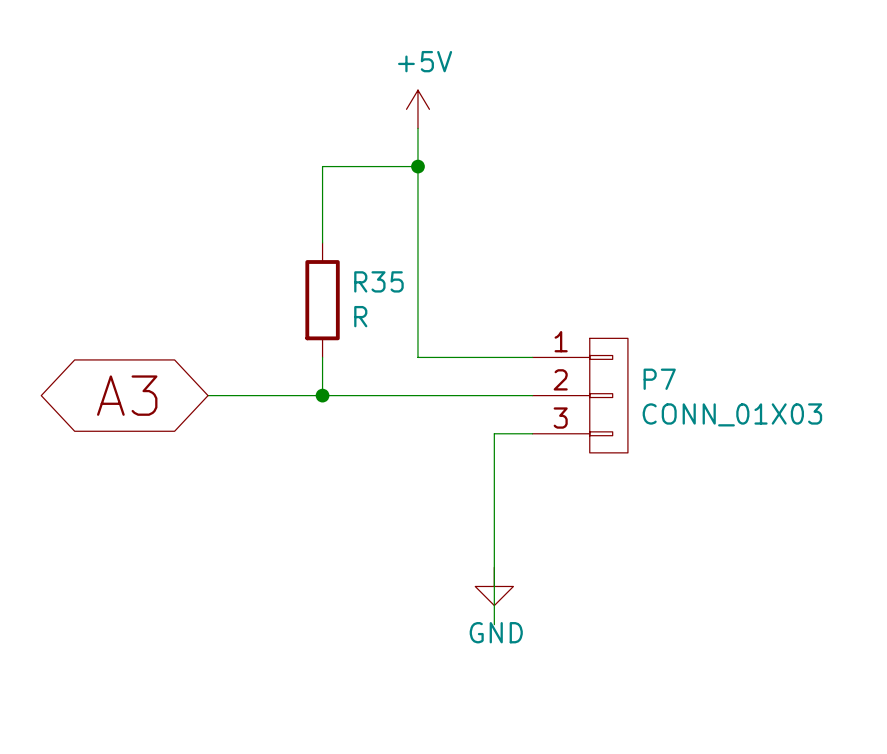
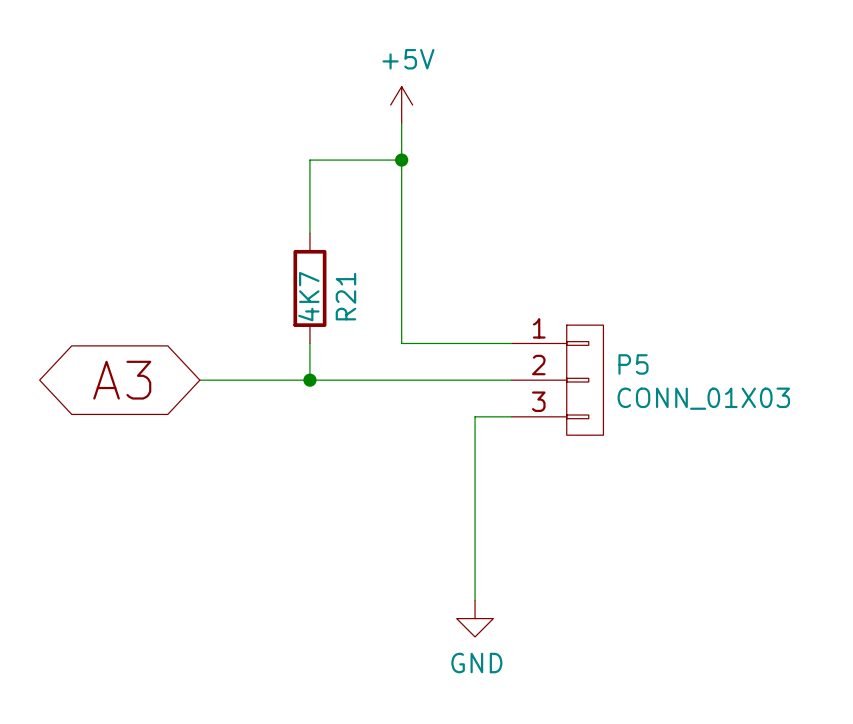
R35 name: R35 (378, 281) -> R21 (345, 296)
R35 value: R (360, 316) -> 4K7 (308, 296)
P7 name: P7 (659, 379) -> P5 (633, 364)
power symbol position: GND (494, 586) -> GND (475, 618)

